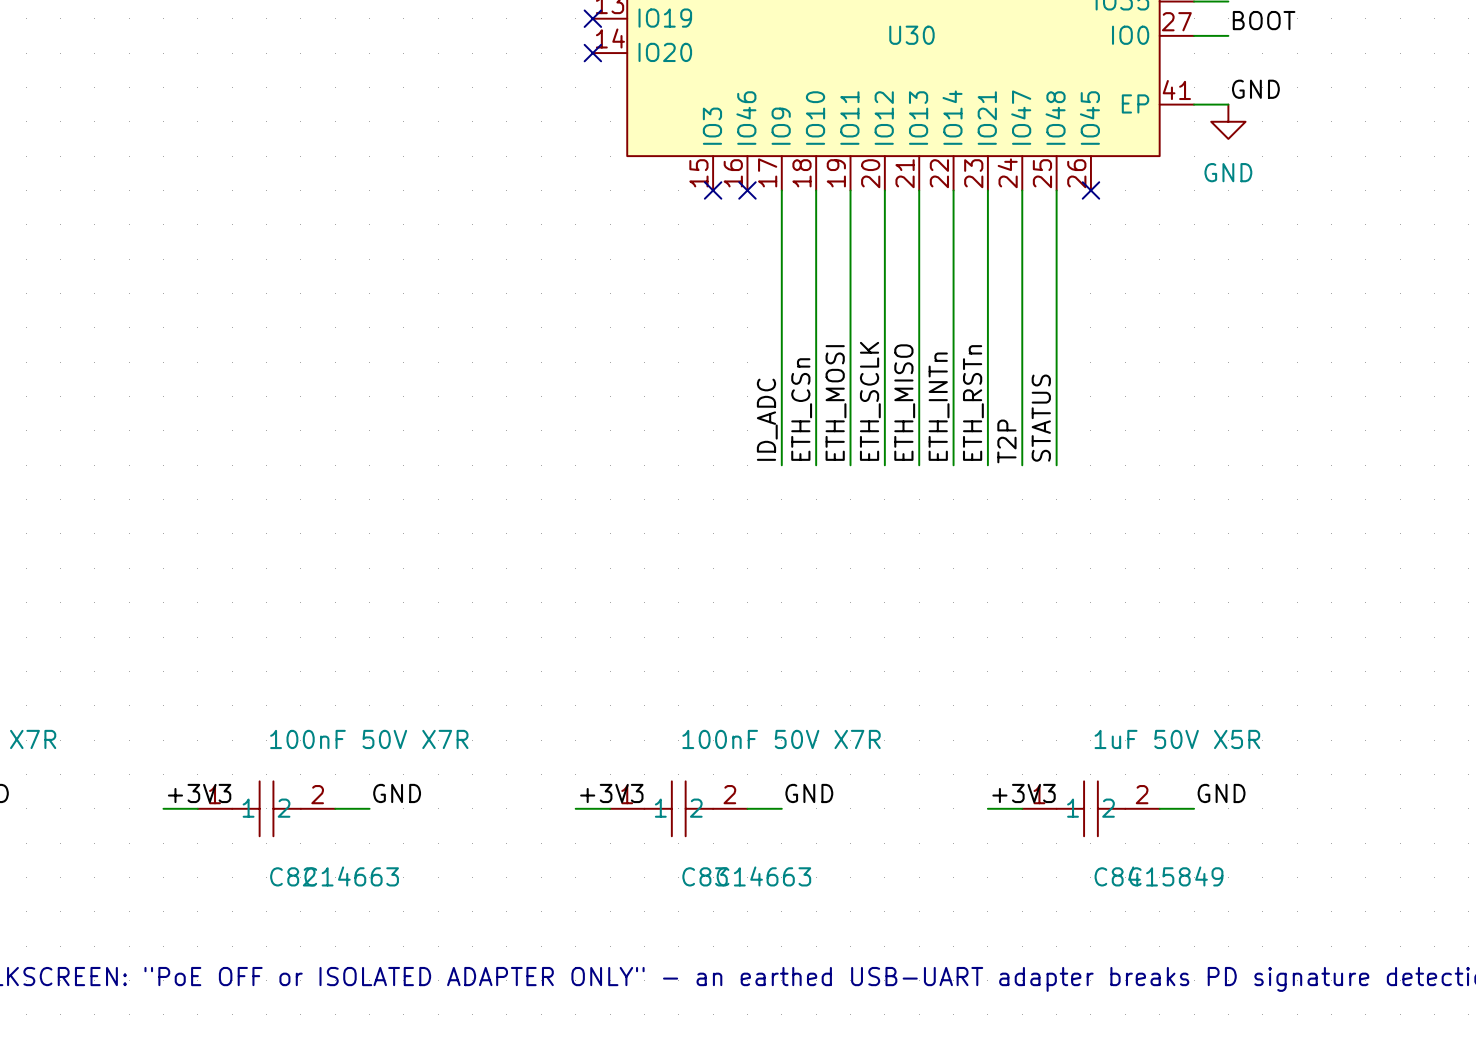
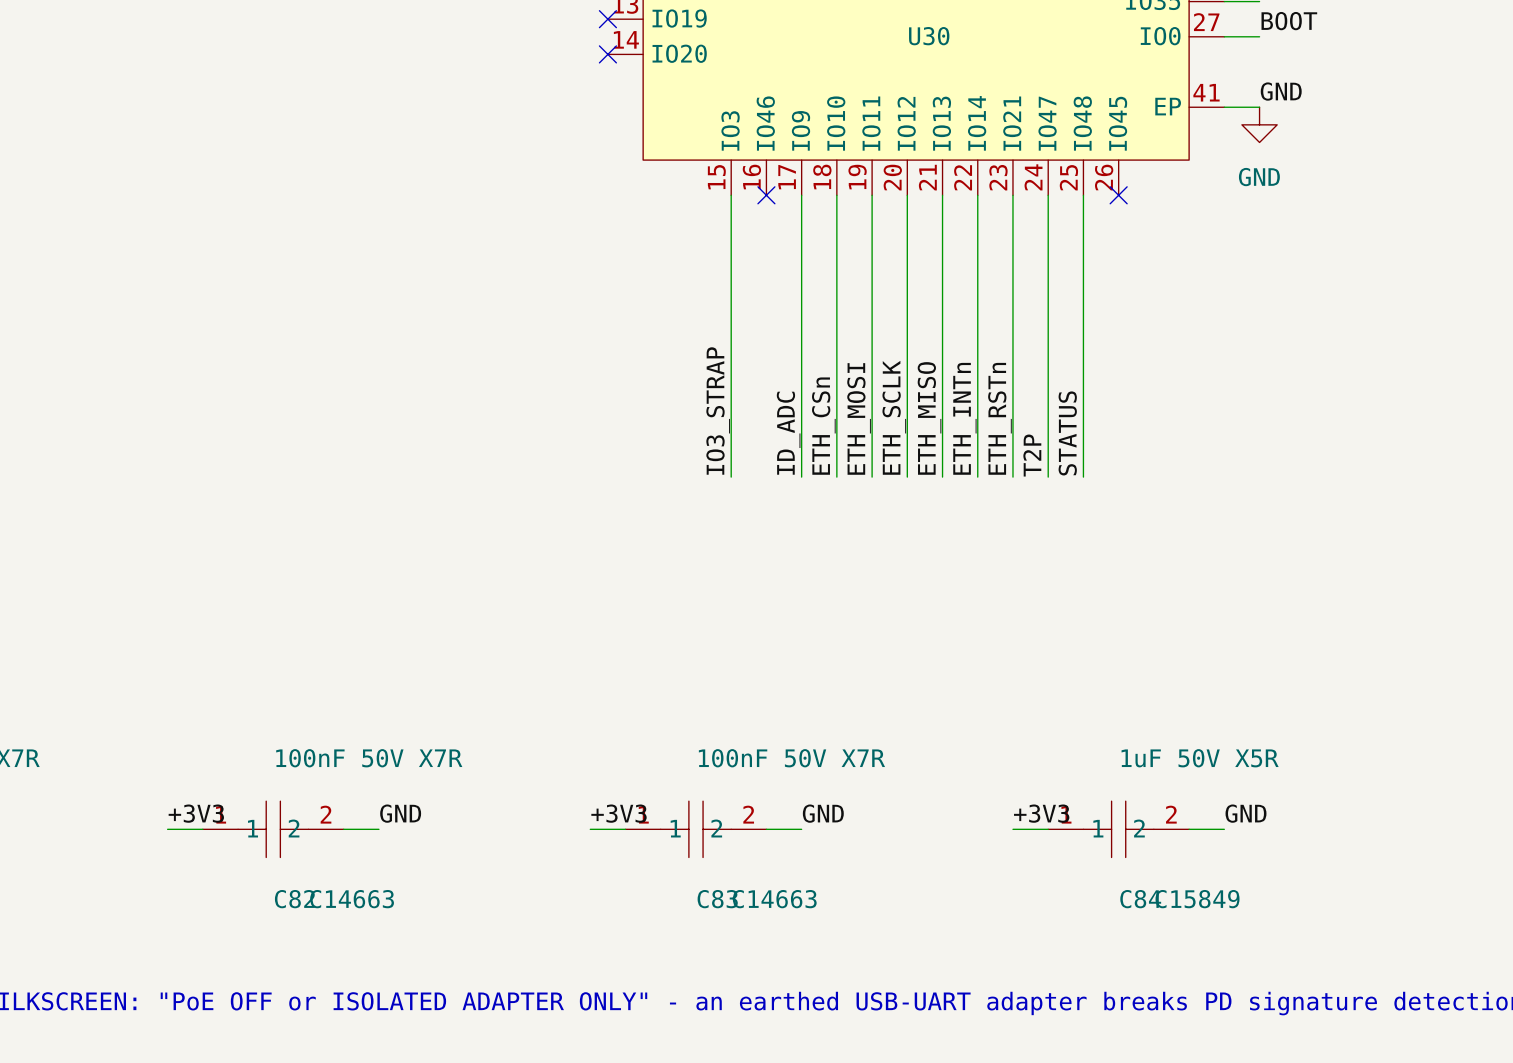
wire: none -> (731, 195) (731, 477)
no-connect mark: (713, 190) -> none
label: none -> IO3_STRAP (718, 411)

